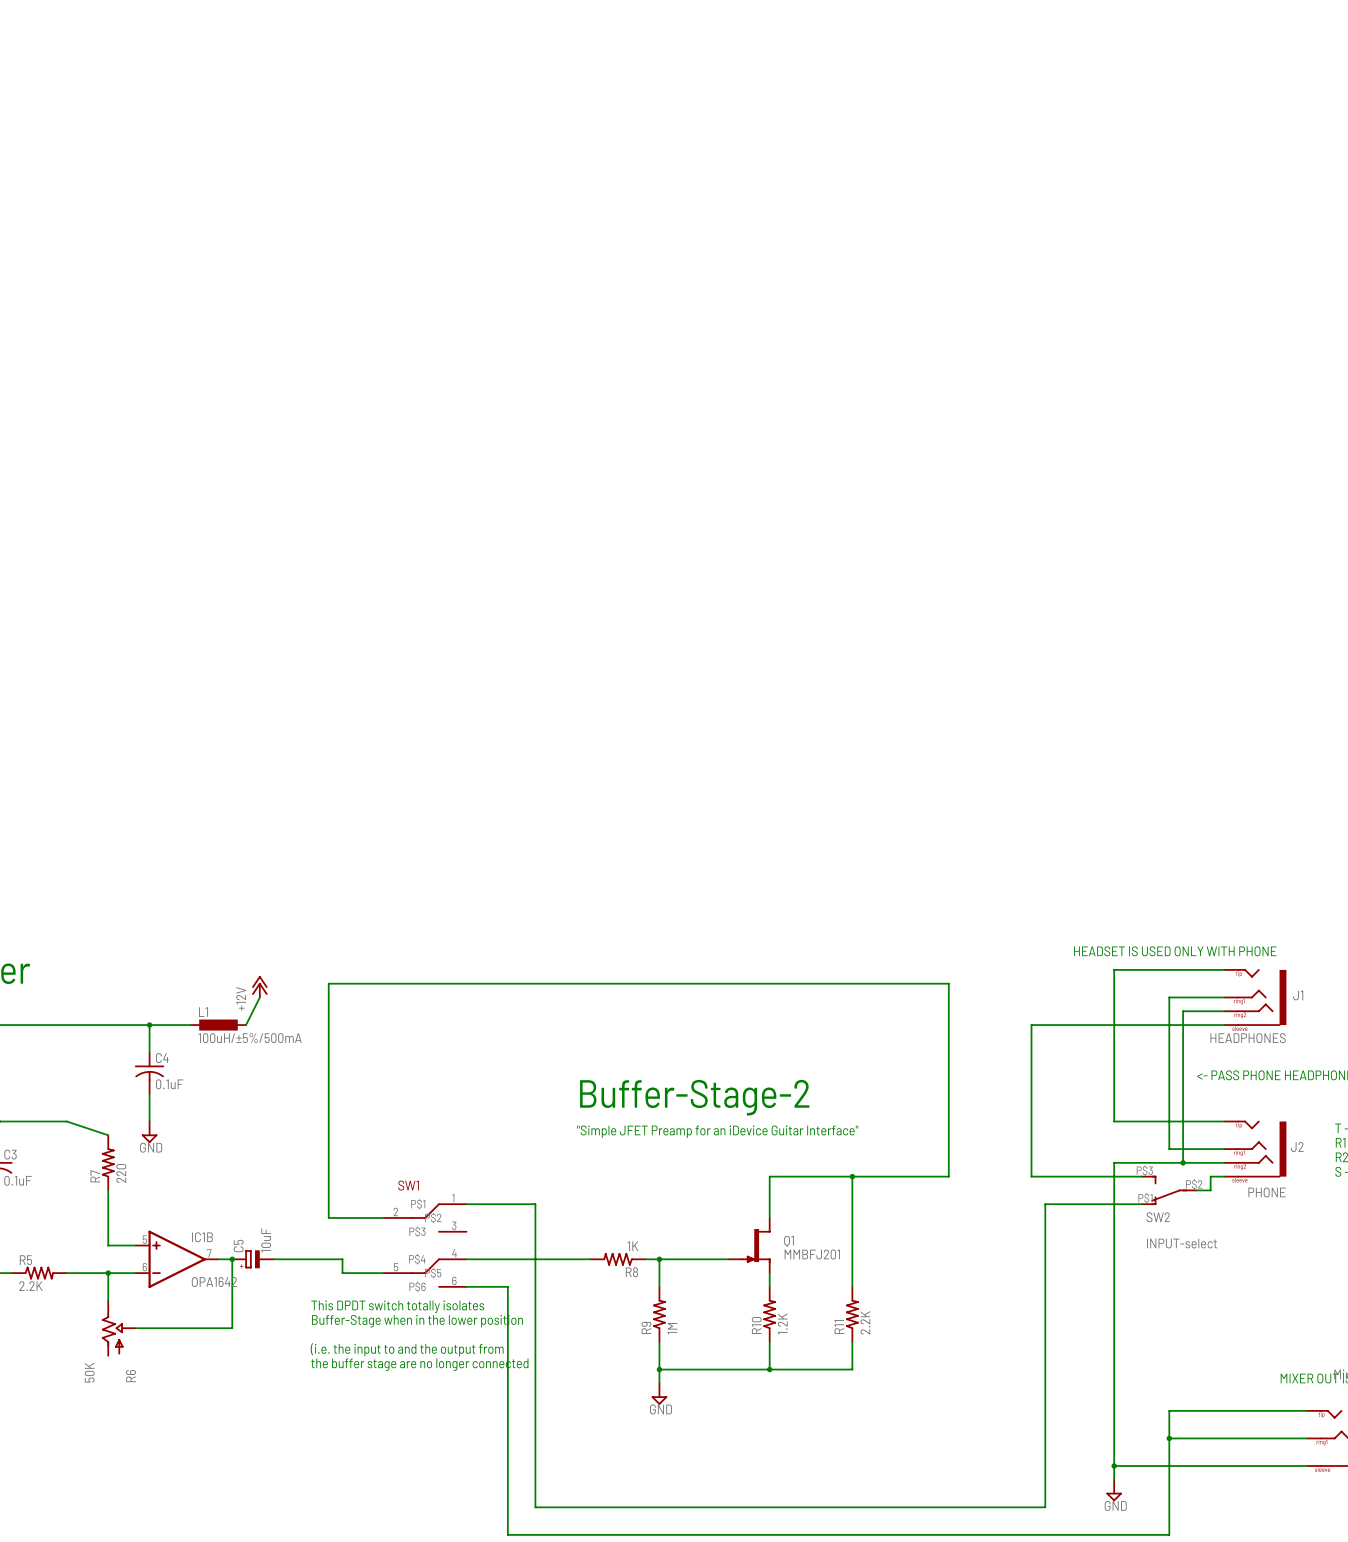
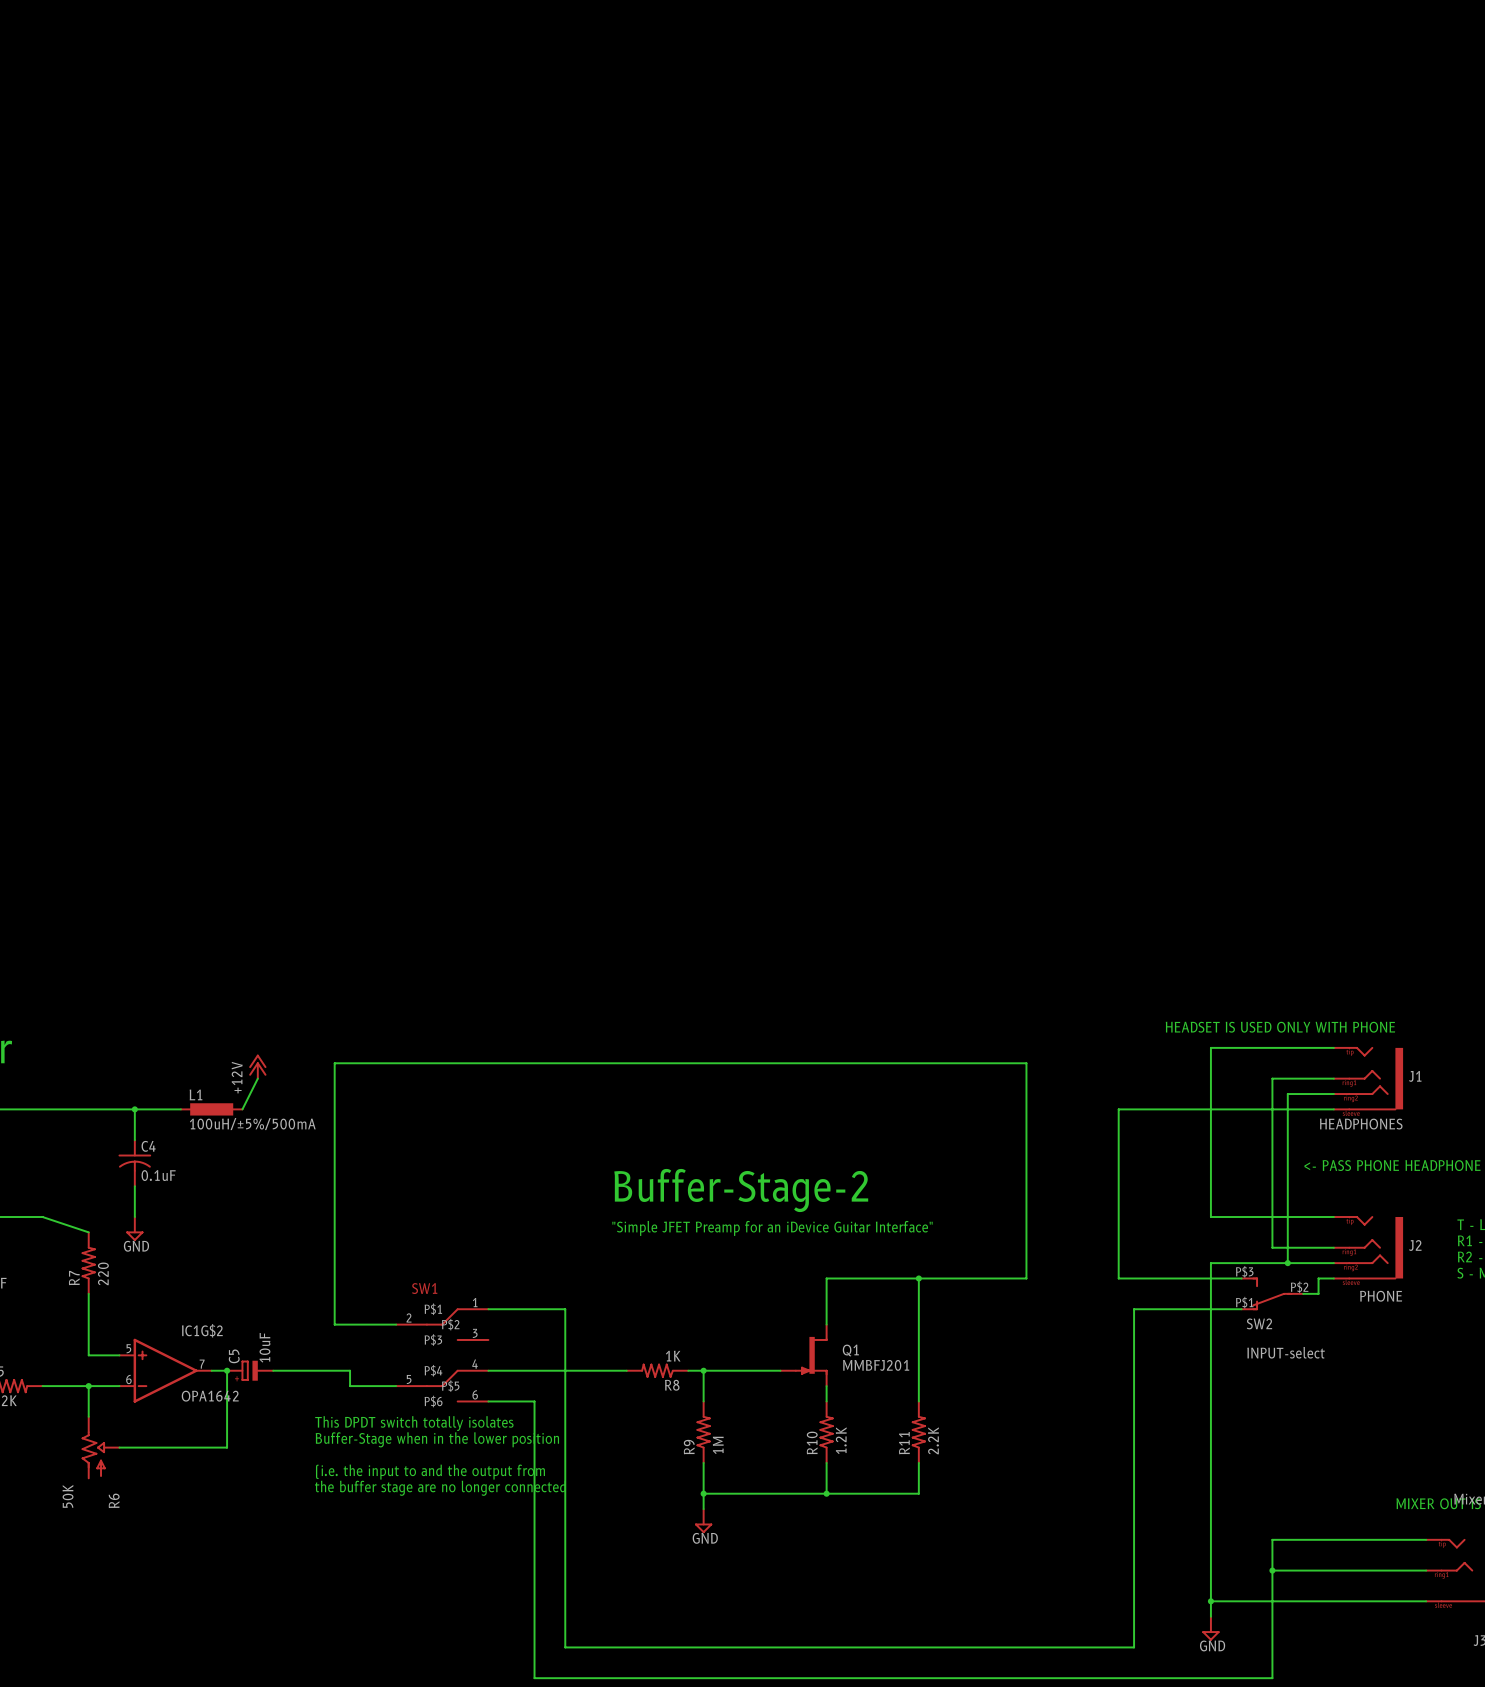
IC1B name: IC1B (202, 1237) -> IC1G$2 (202, 1330)

